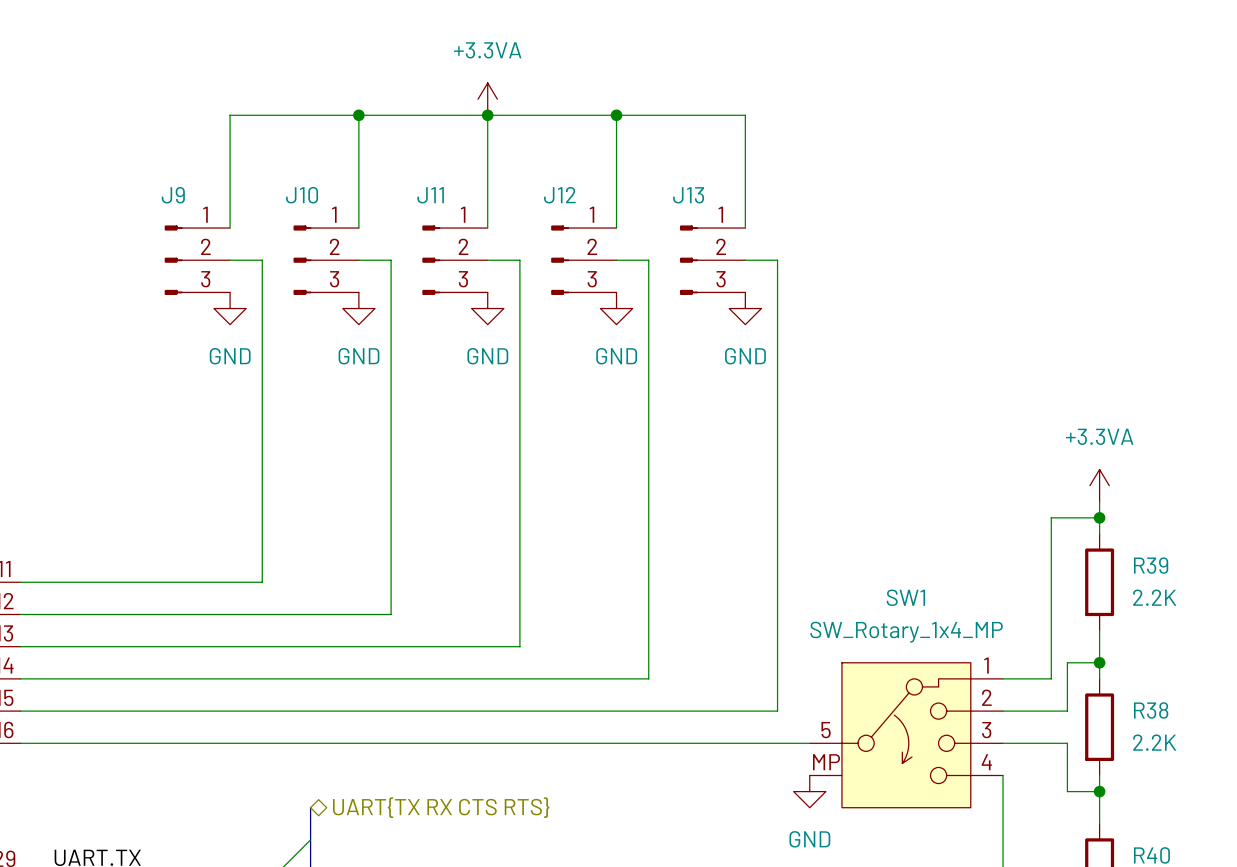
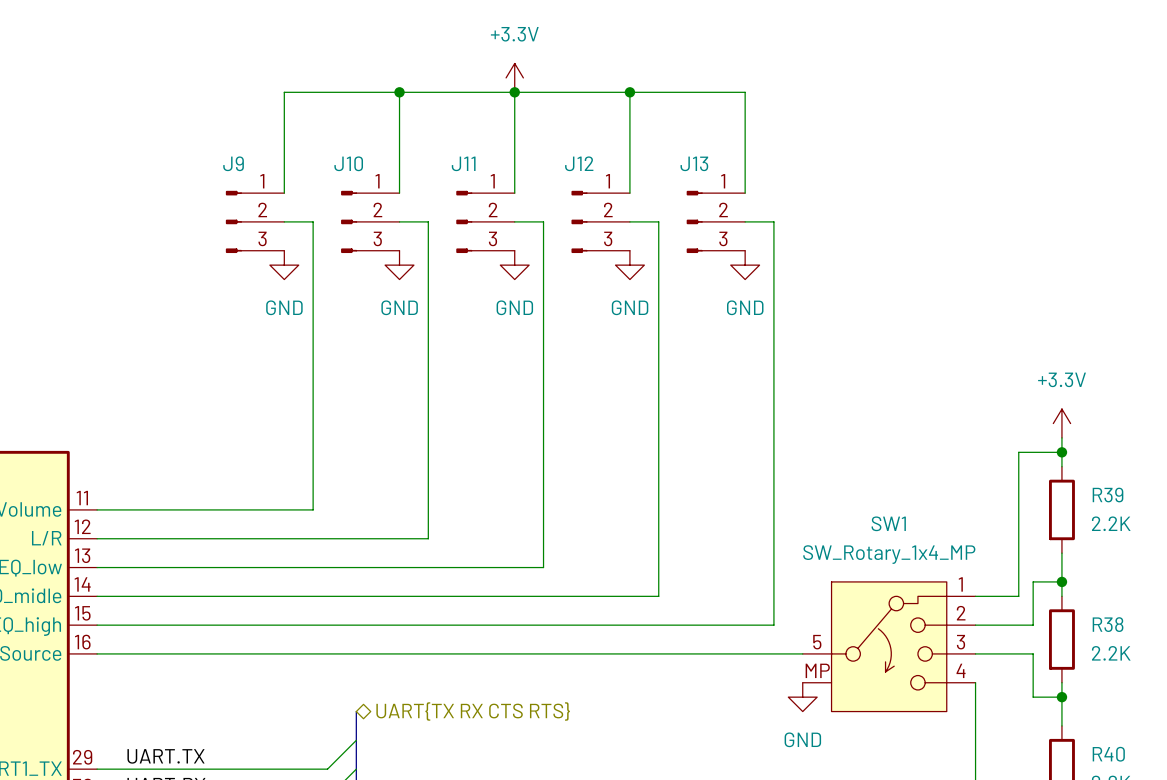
power symbol: +3.3VA (487, 99) -> +3.3V (514, 77)
power symbol: +3.3VA (1099, 485) -> +3.3V (1061, 423)

